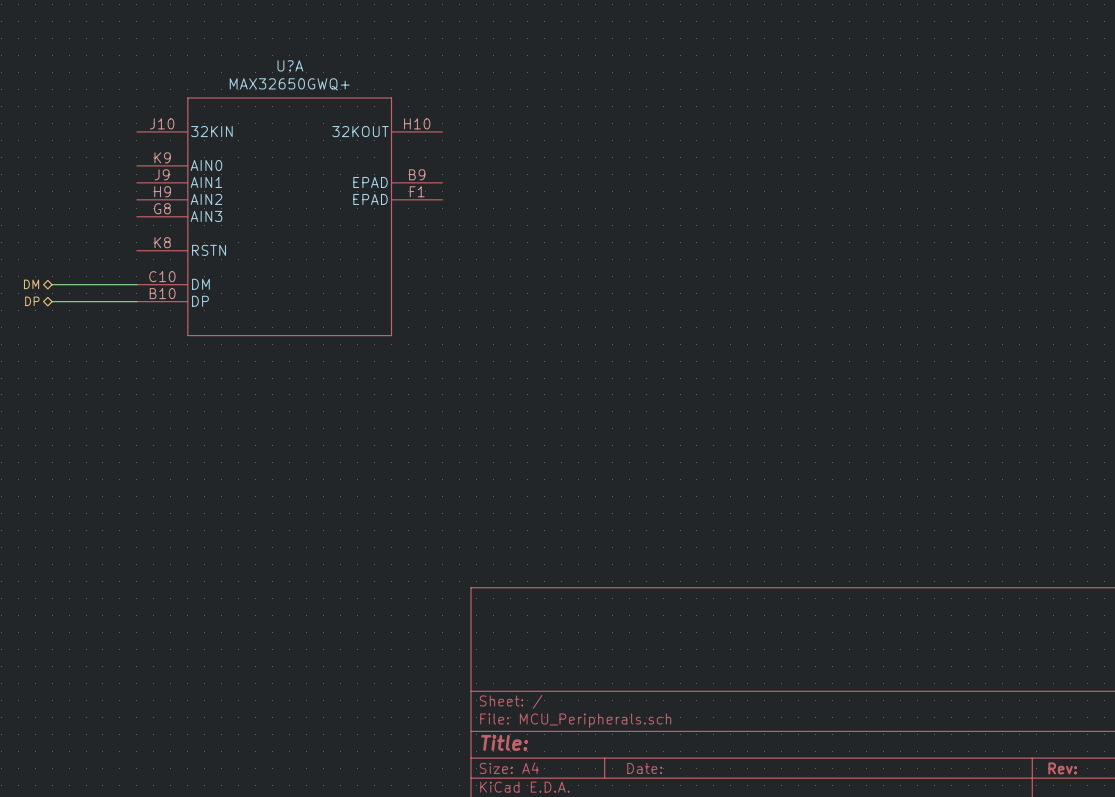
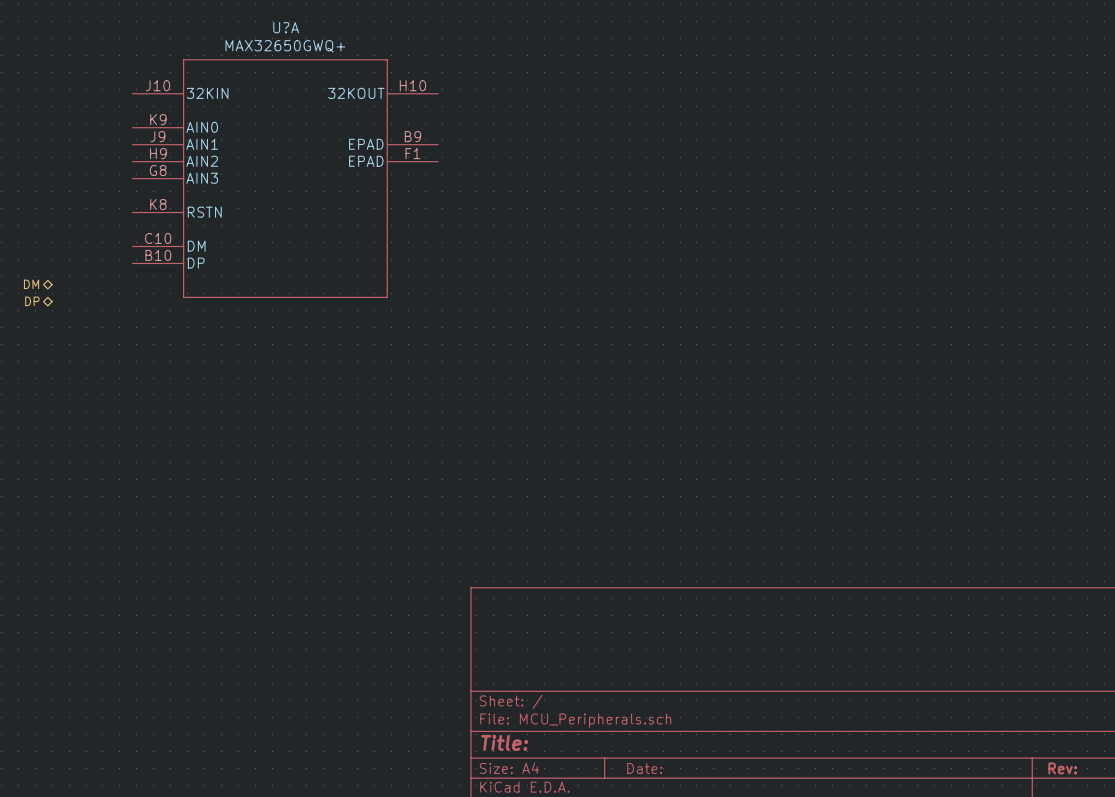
U?A position: (289, 216) -> (285, 178)
wire: (52, 284) (136, 284) -> none
wire: (52, 301) (136, 301) -> none

